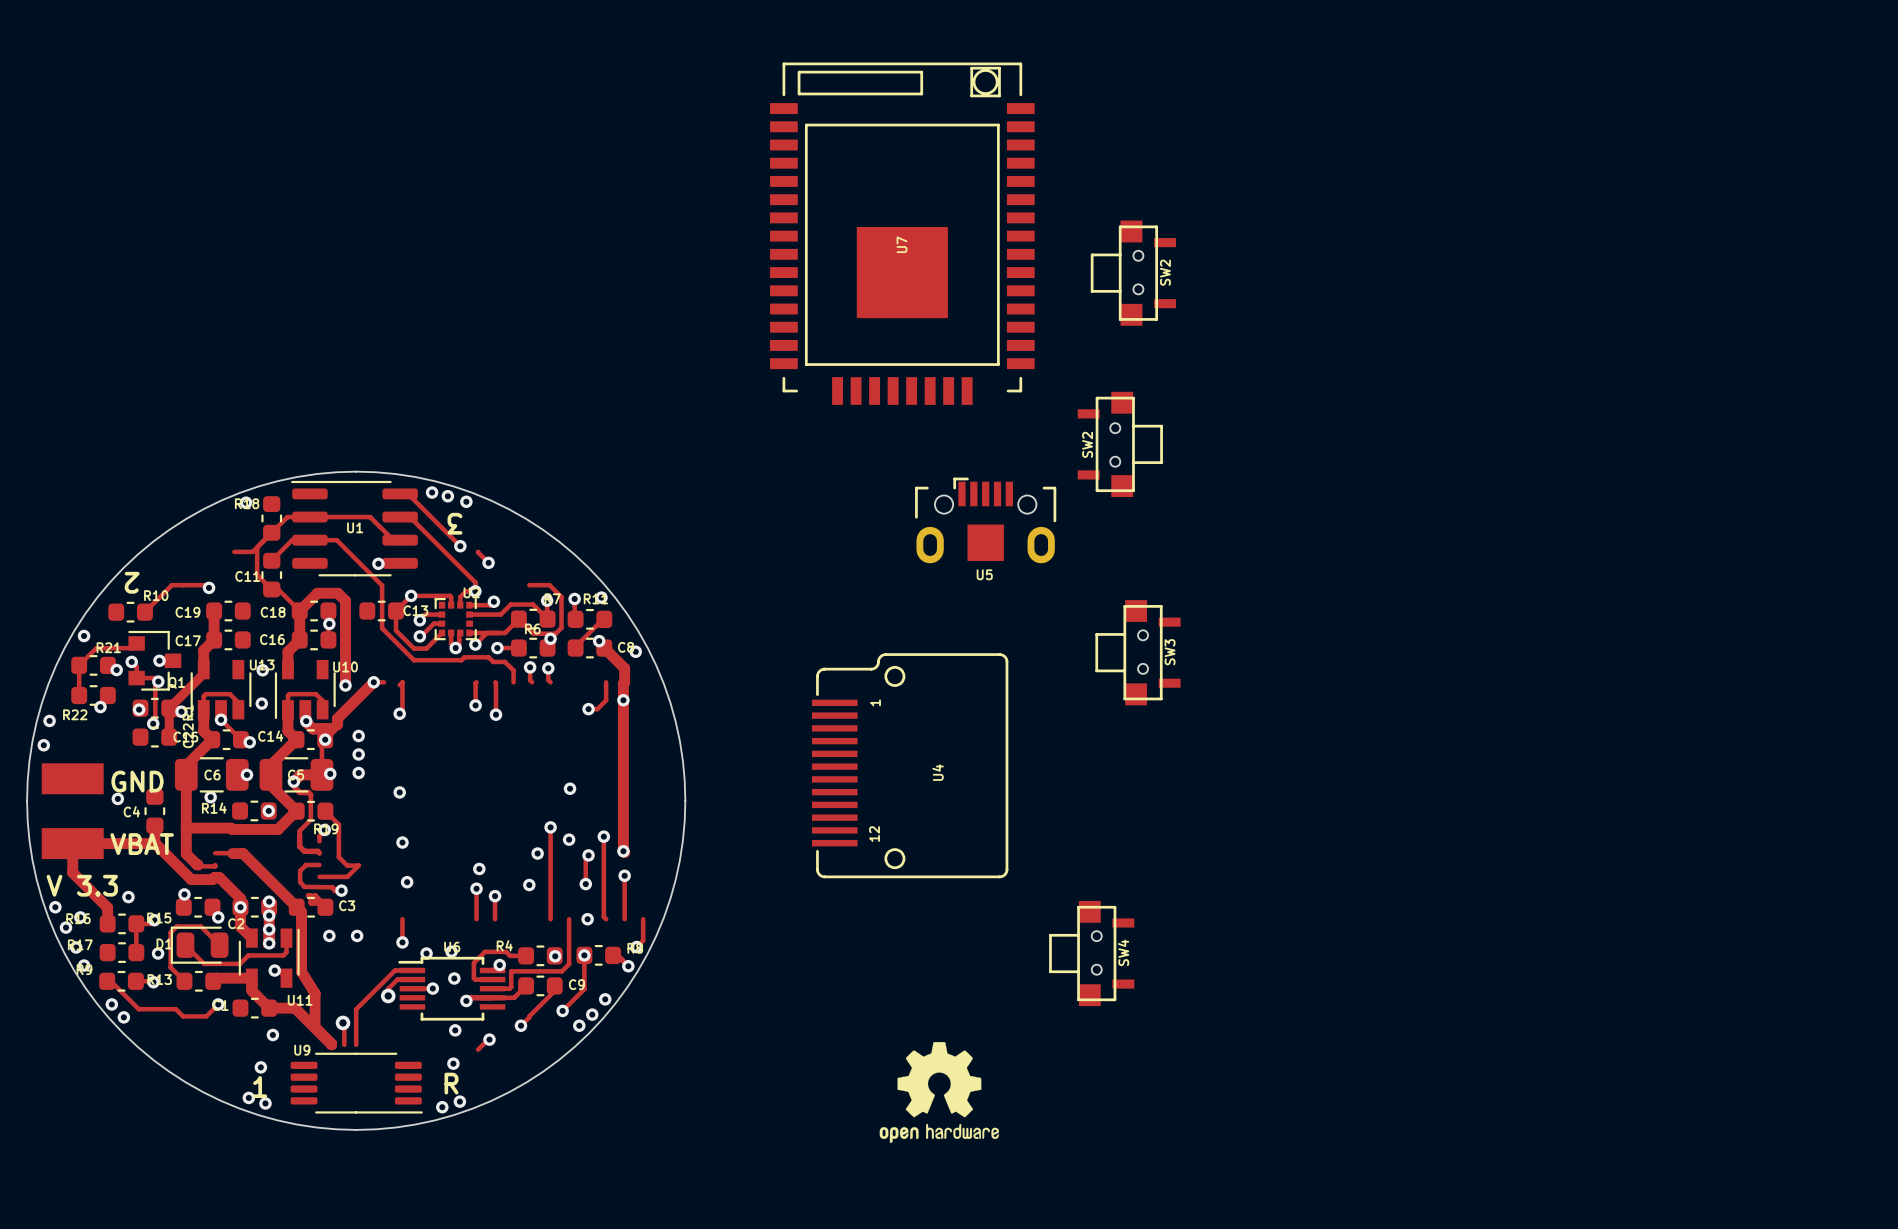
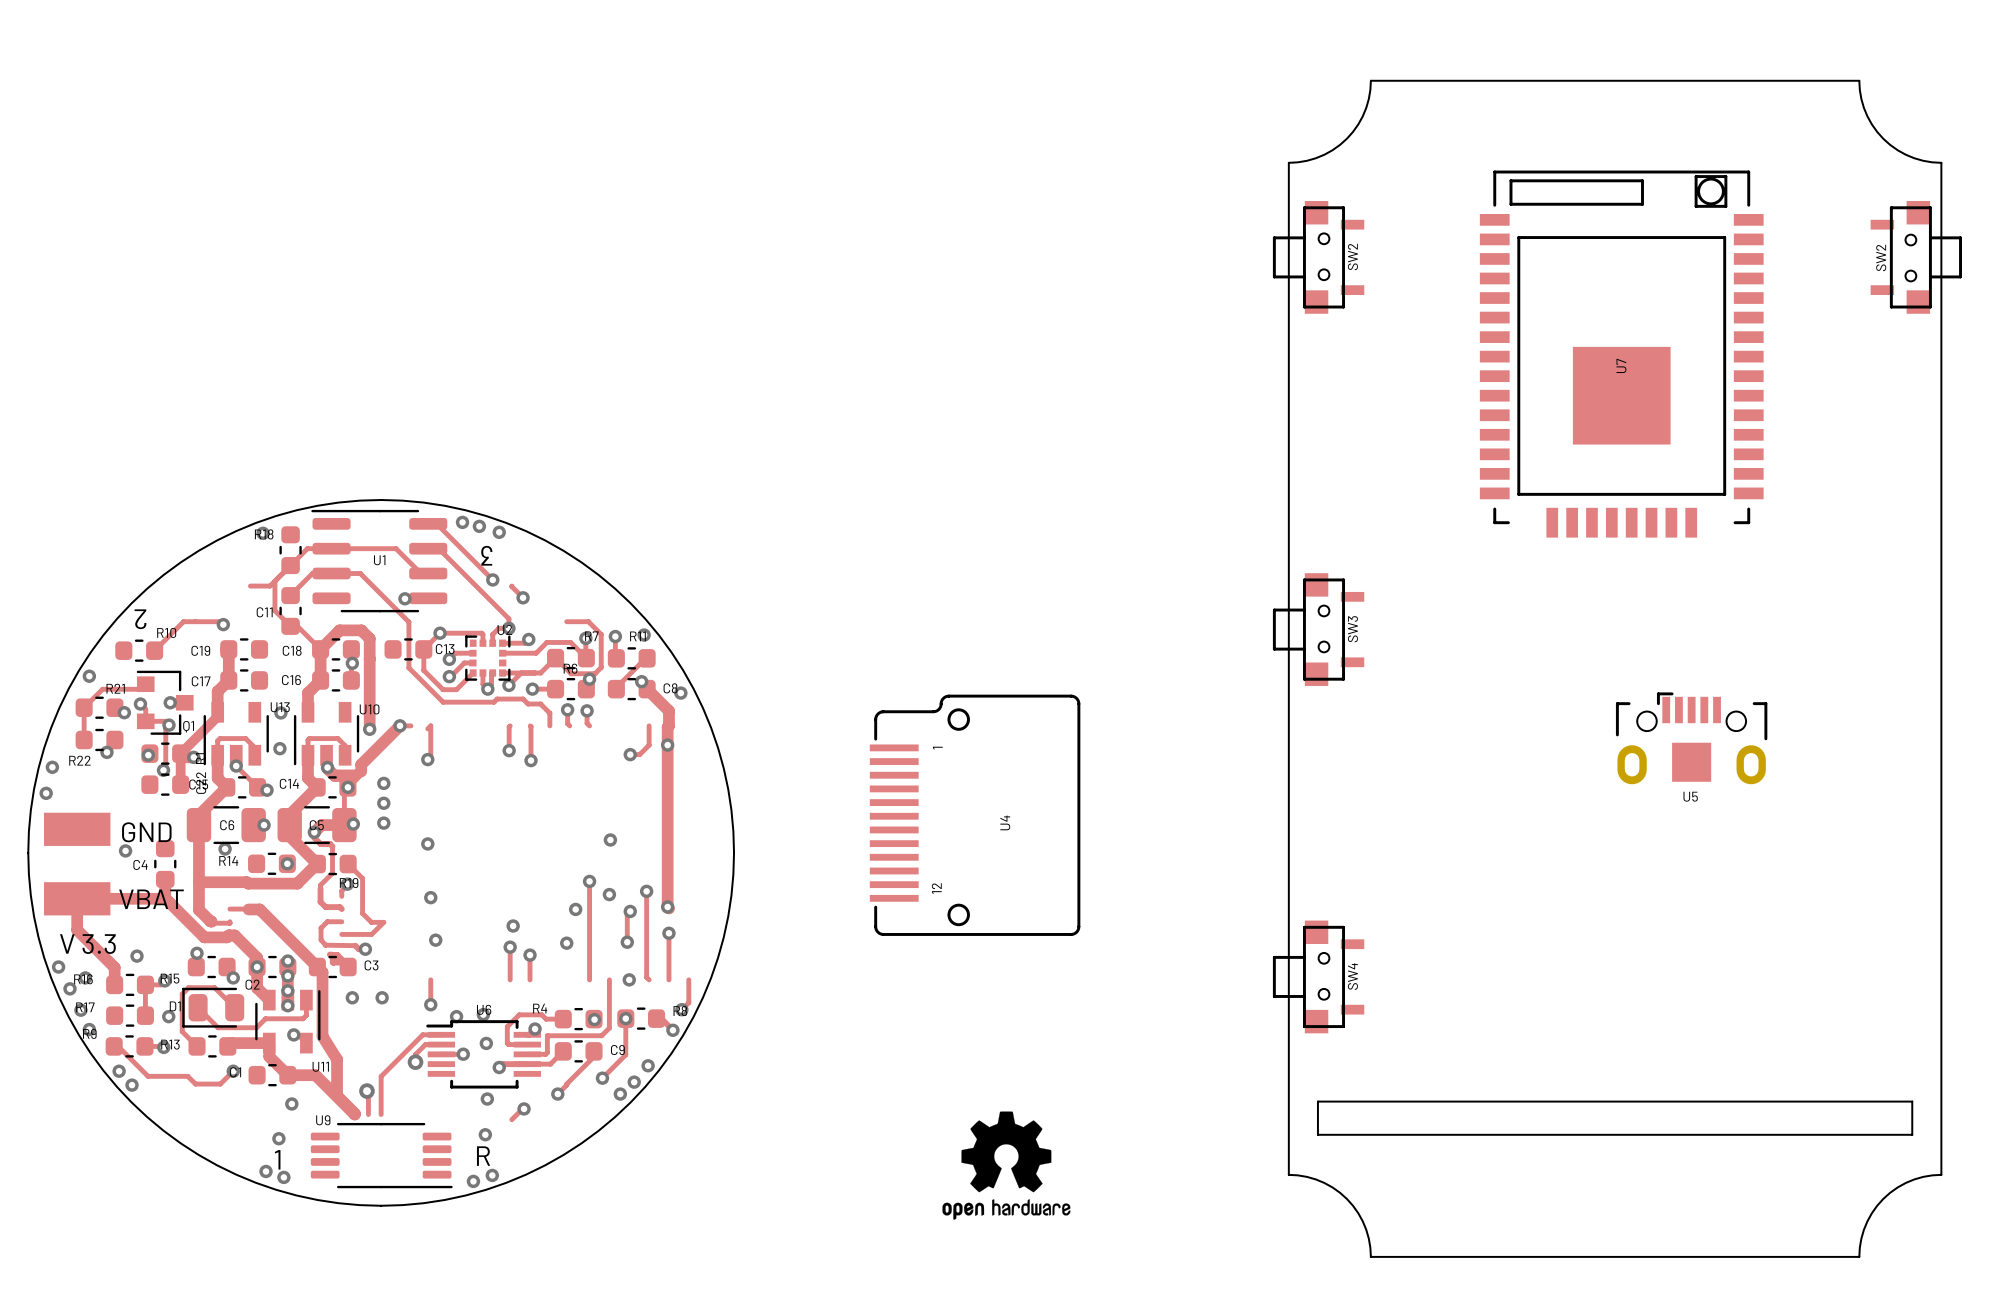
board edge: none -> (1370, 80) (1859, 80) (1863, 107) (1871, 124) (1883, 138) (1897, 150) (1914, 158) (1941, 162) (1941, 1174) (1923, 1176) (1905, 1182) (1883, 1198) (1871, 1213) (1863, 1229) (1859, 1256) (1370, 1256) (1368, 1238) (1362, 1221) (1346, 1198) (1332, 1187) (1315, 1179) (1288, 1174) (1288, 162) (1315, 158) (1332, 150) (1346, 138) (1362, 116) (1368, 99) (1370, 80)
U7 position: (902, 233) -> (1621, 354)
SW2: none -> (1916, 257)
SW2 position: (1133, 273) -> (1318, 257)
SW2: (1120, 444) -> none
U5 footprint: [915, 477, 1057, 564] -> [1615, 692, 1768, 785]
SW3 position: (1137, 652) -> (1318, 629)
SW4 position: (1091, 953) -> (1318, 976)
board edge: none -> (1317, 1101) (1912, 1101) (1912, 1134) (1317, 1134) (1317, 1101)

